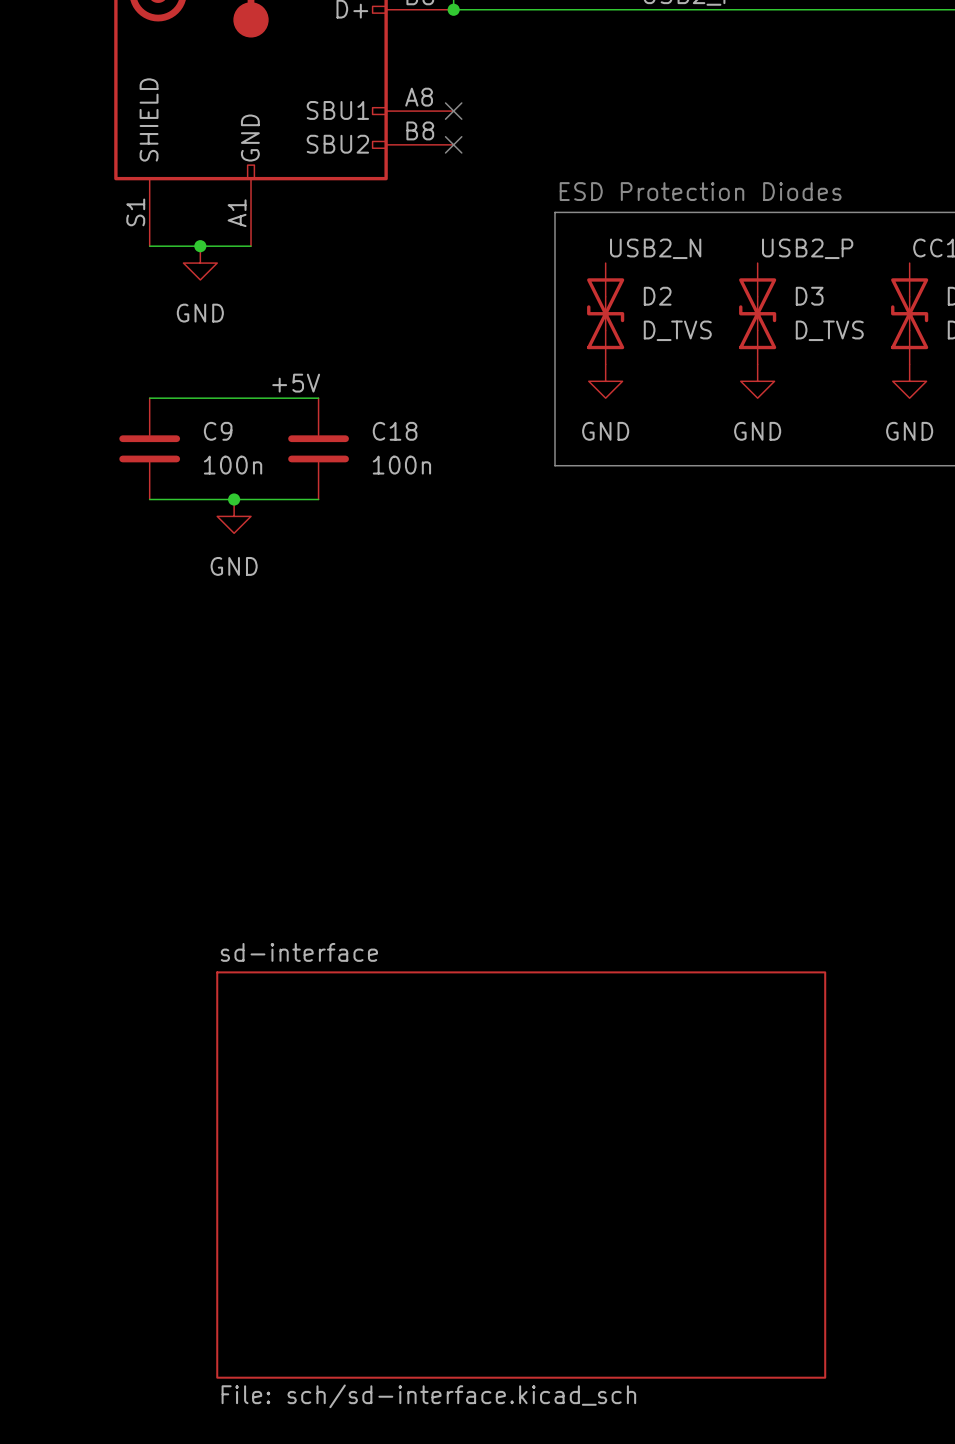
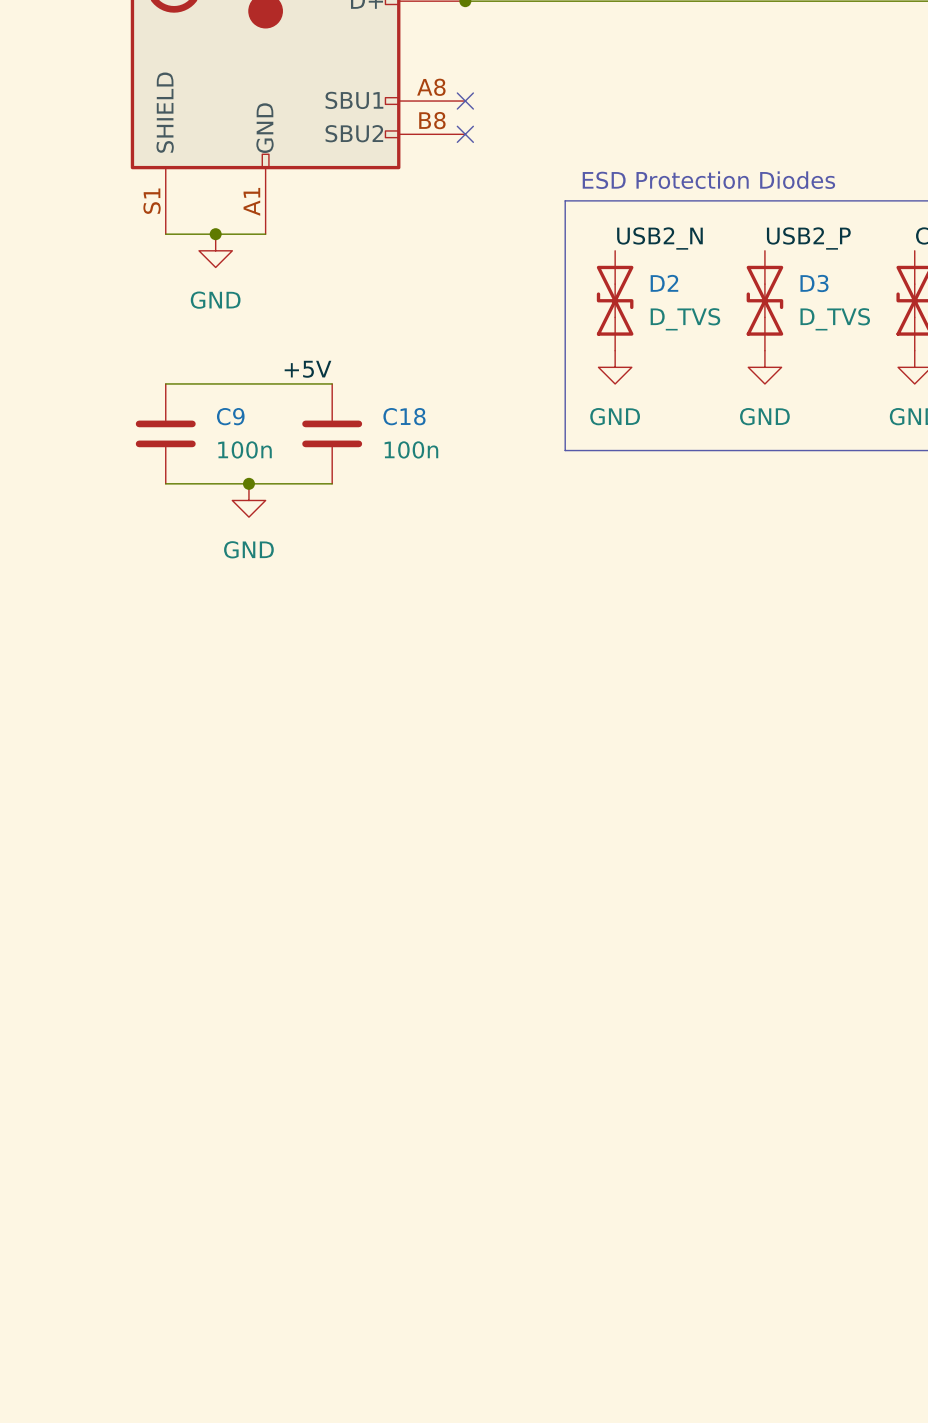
sheet sd-interface: File: sch/sd-interface.kicad_sch (521, 1175) -> none

